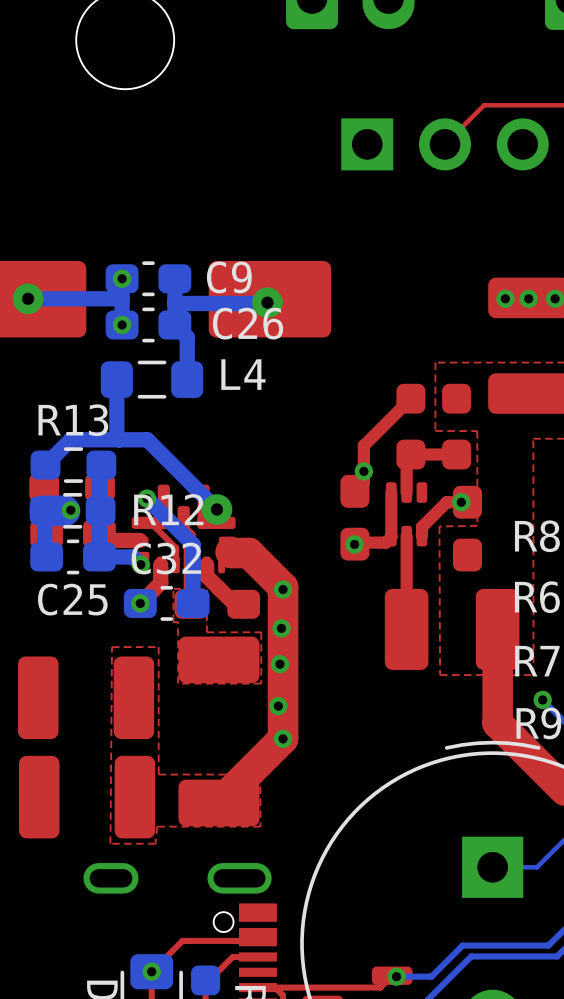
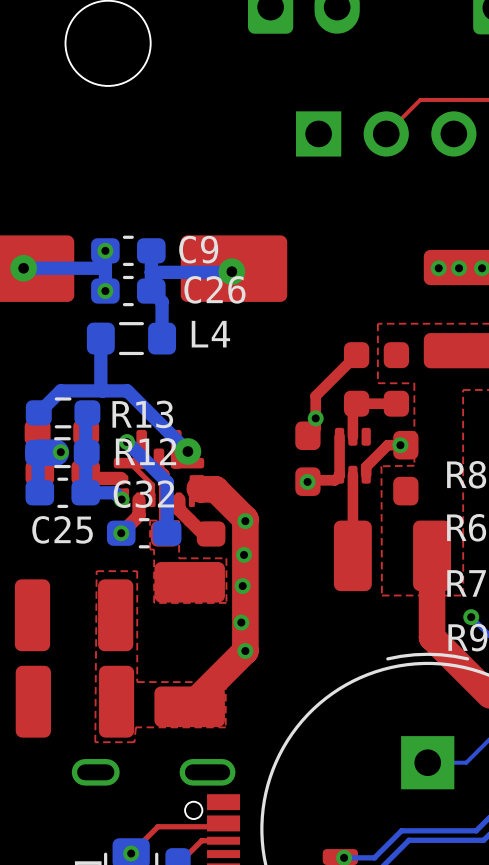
R13 name position: R13 (73, 420) -> R13 (142, 414)

